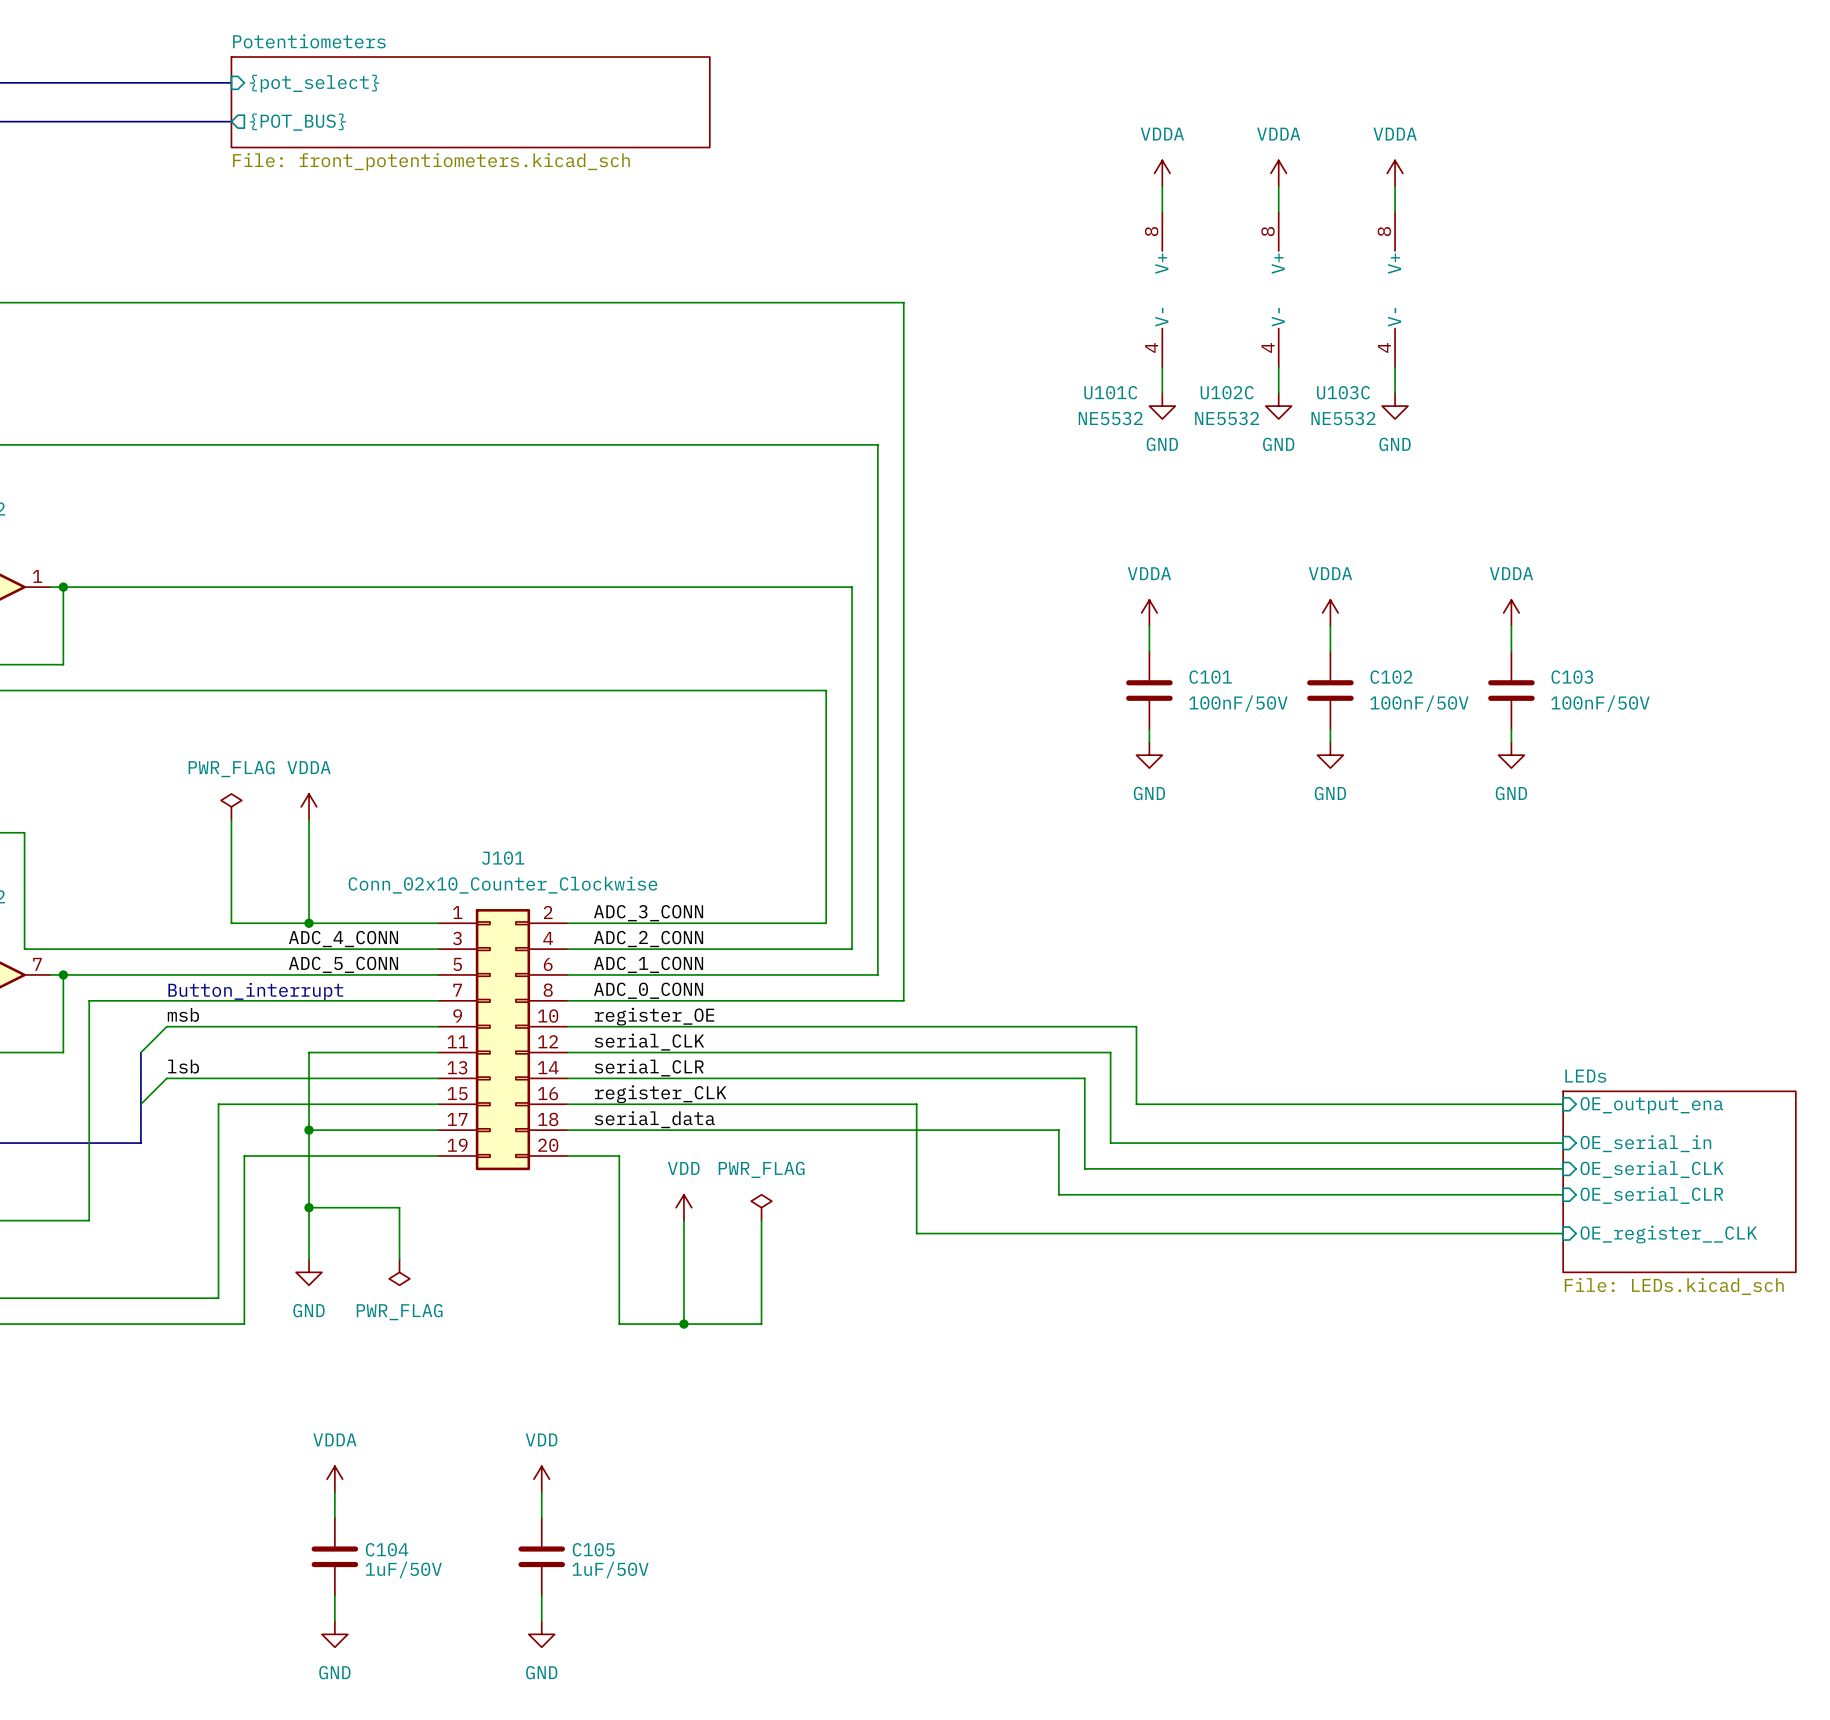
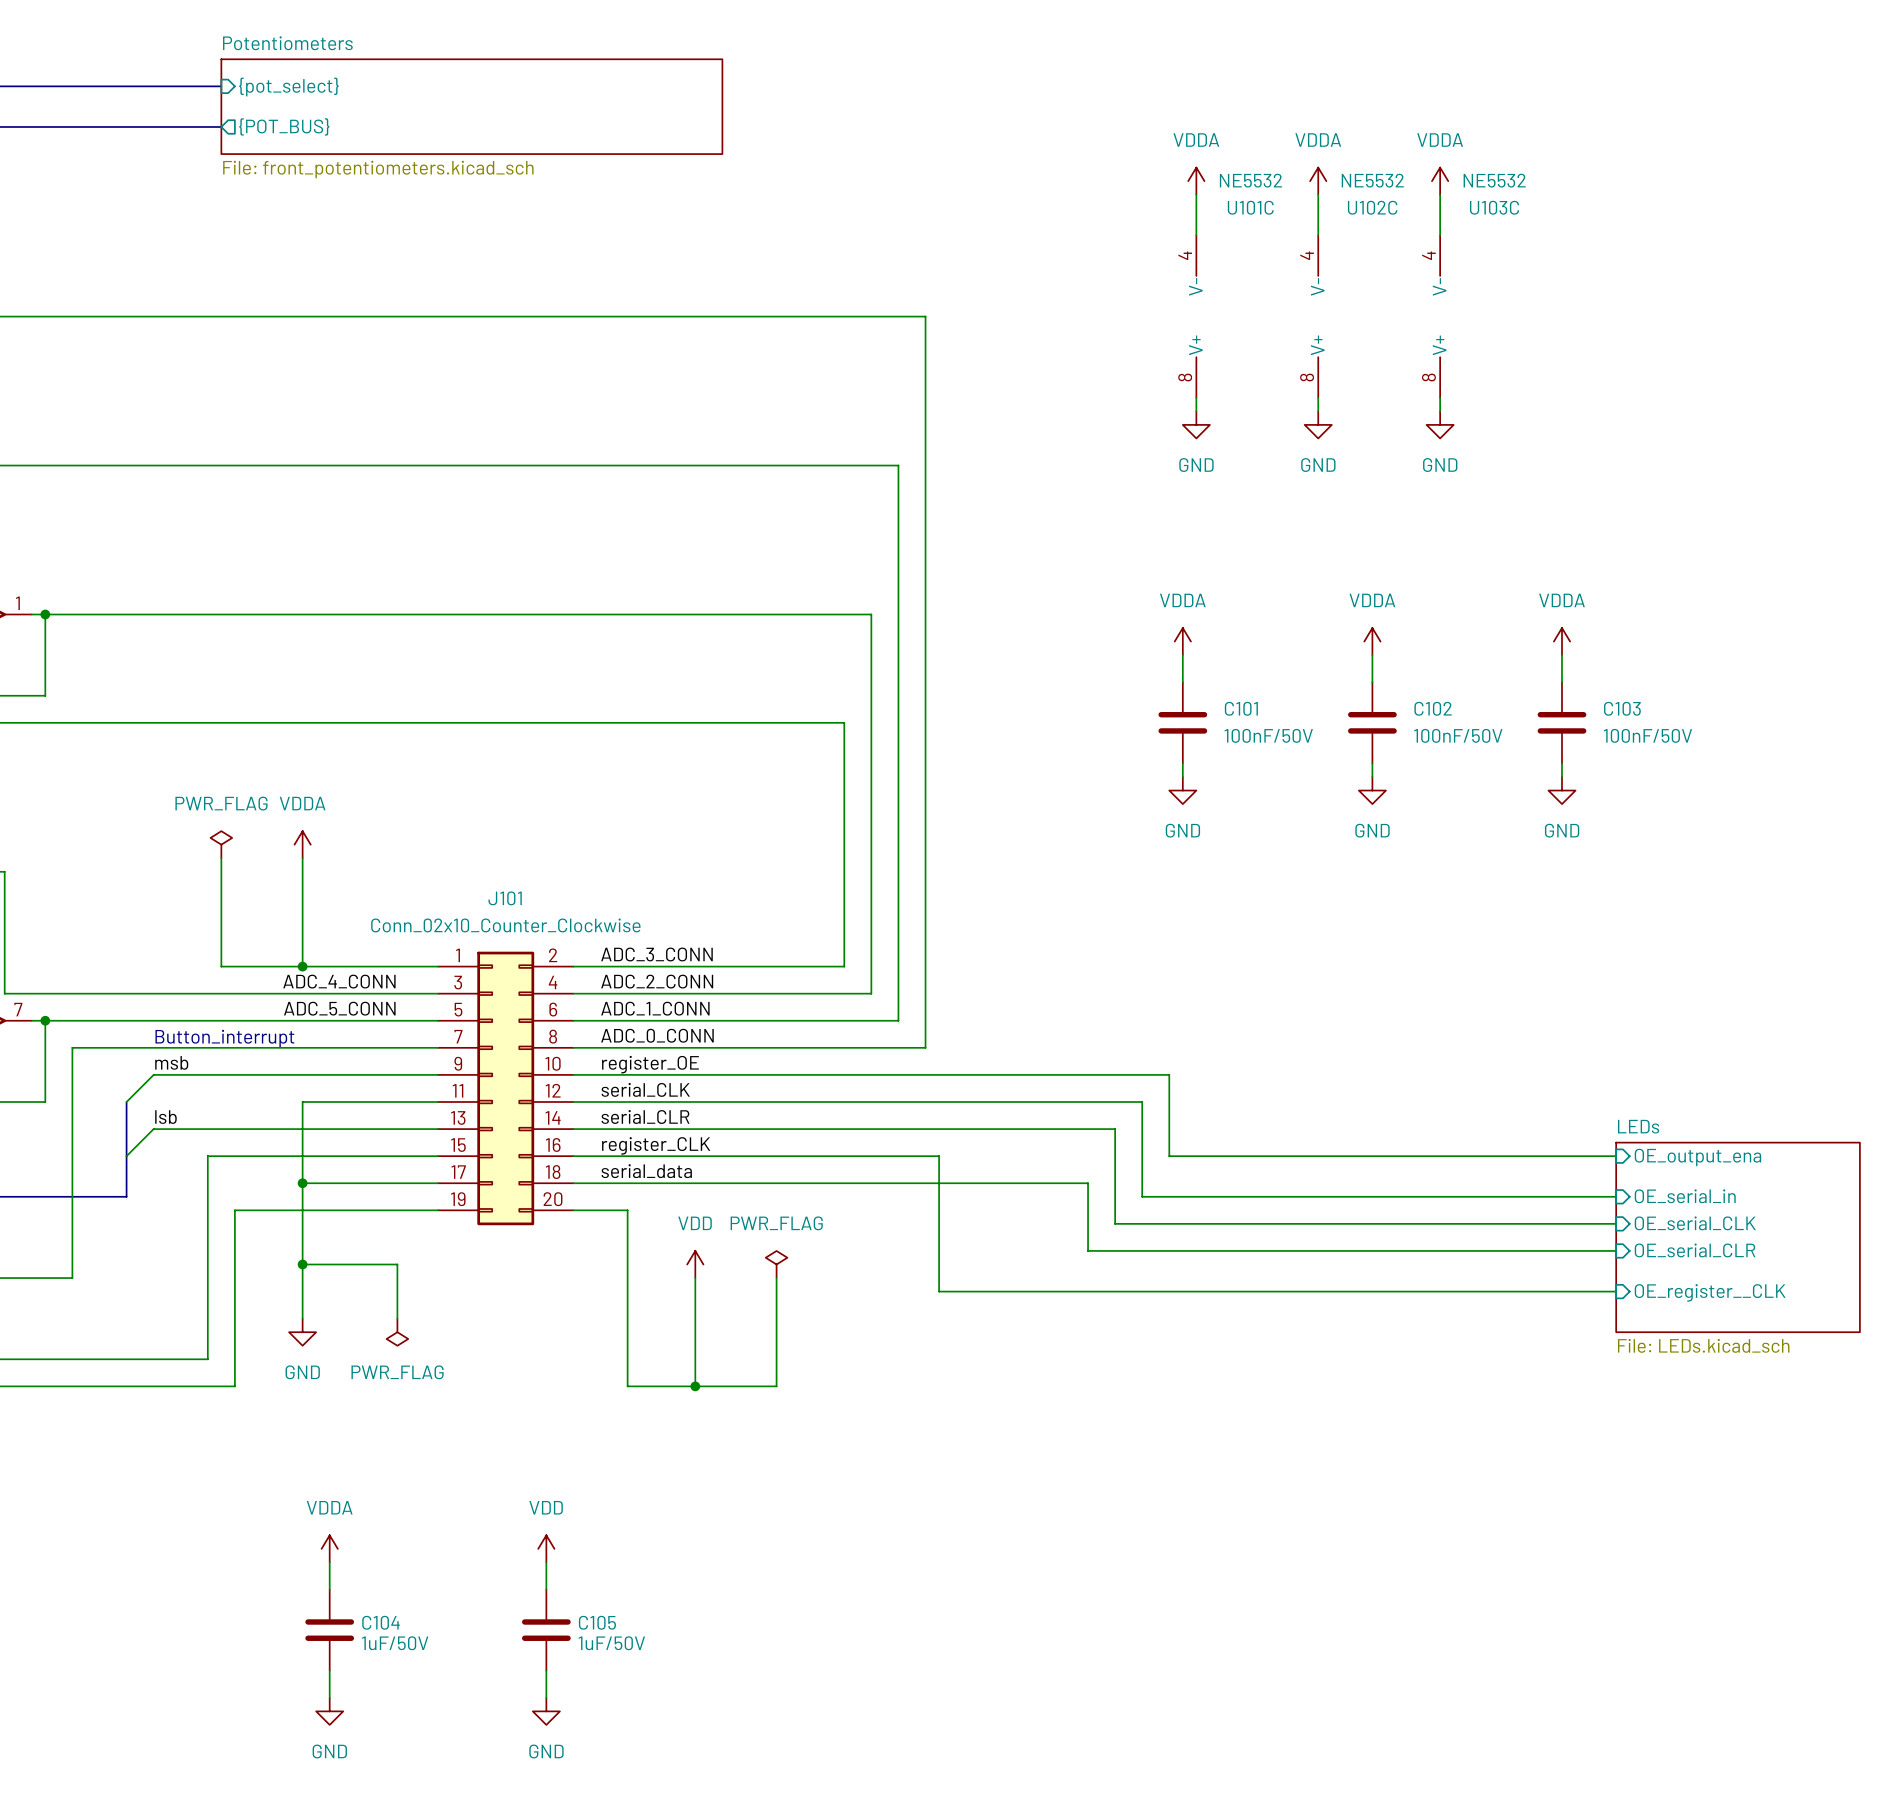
U101C rotation: 0° (1162, 289) -> 180° (1196, 316)
U102C rotation: 0° (1278, 289) -> 180° (1318, 316)
U103C rotation: 0° (1395, 289) -> 180° (1440, 316)

